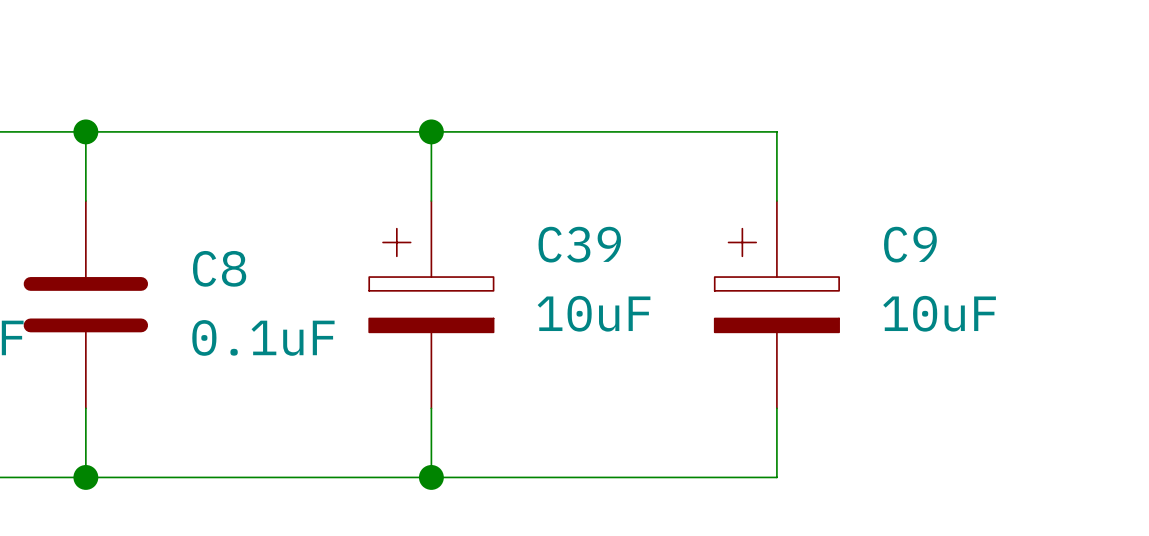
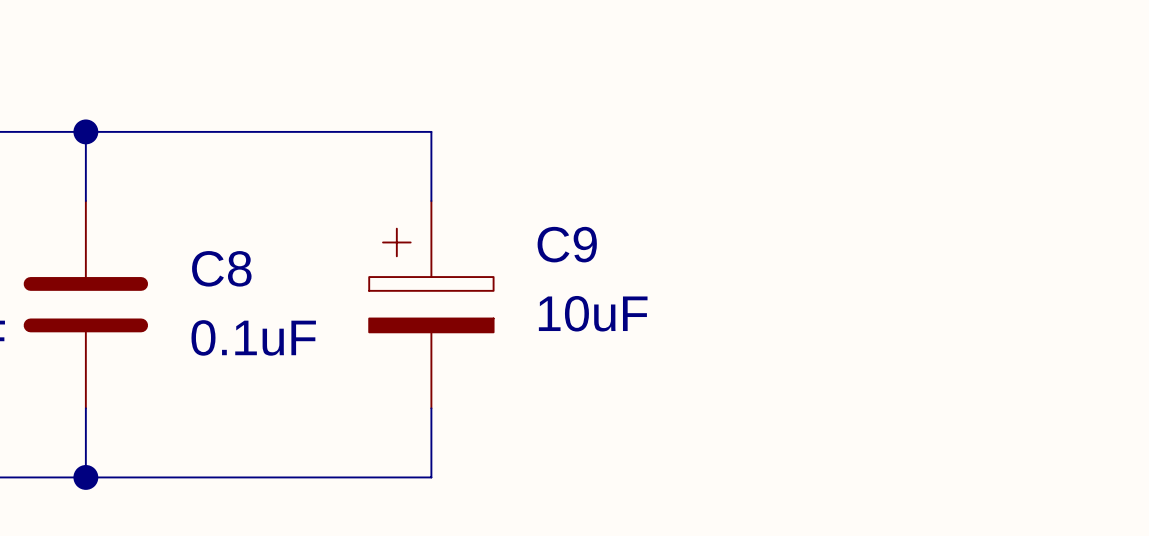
wire: (431, 131) (776, 131) (776, 201) -> none
junction: (431, 131) -> none
C39 name: C39 (579, 244) -> C9 (567, 244)
C9: 10uF (776, 304) -> none
wire: (776, 408) (776, 477) (431, 477) -> none
junction: (431, 477) -> none

